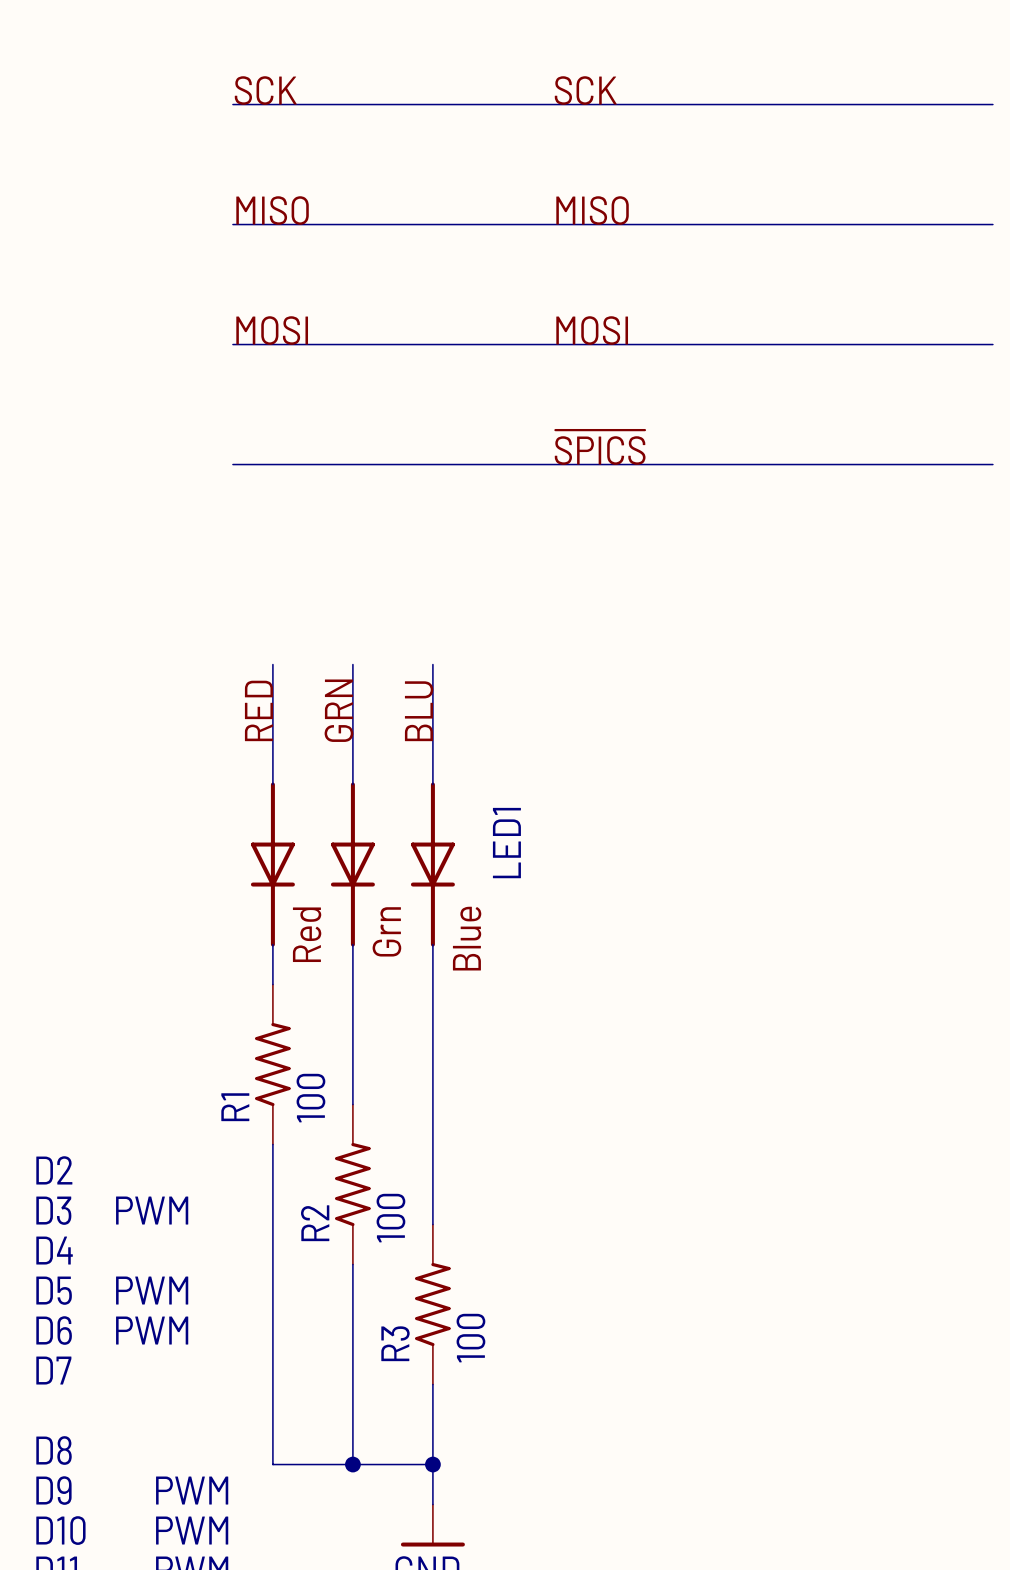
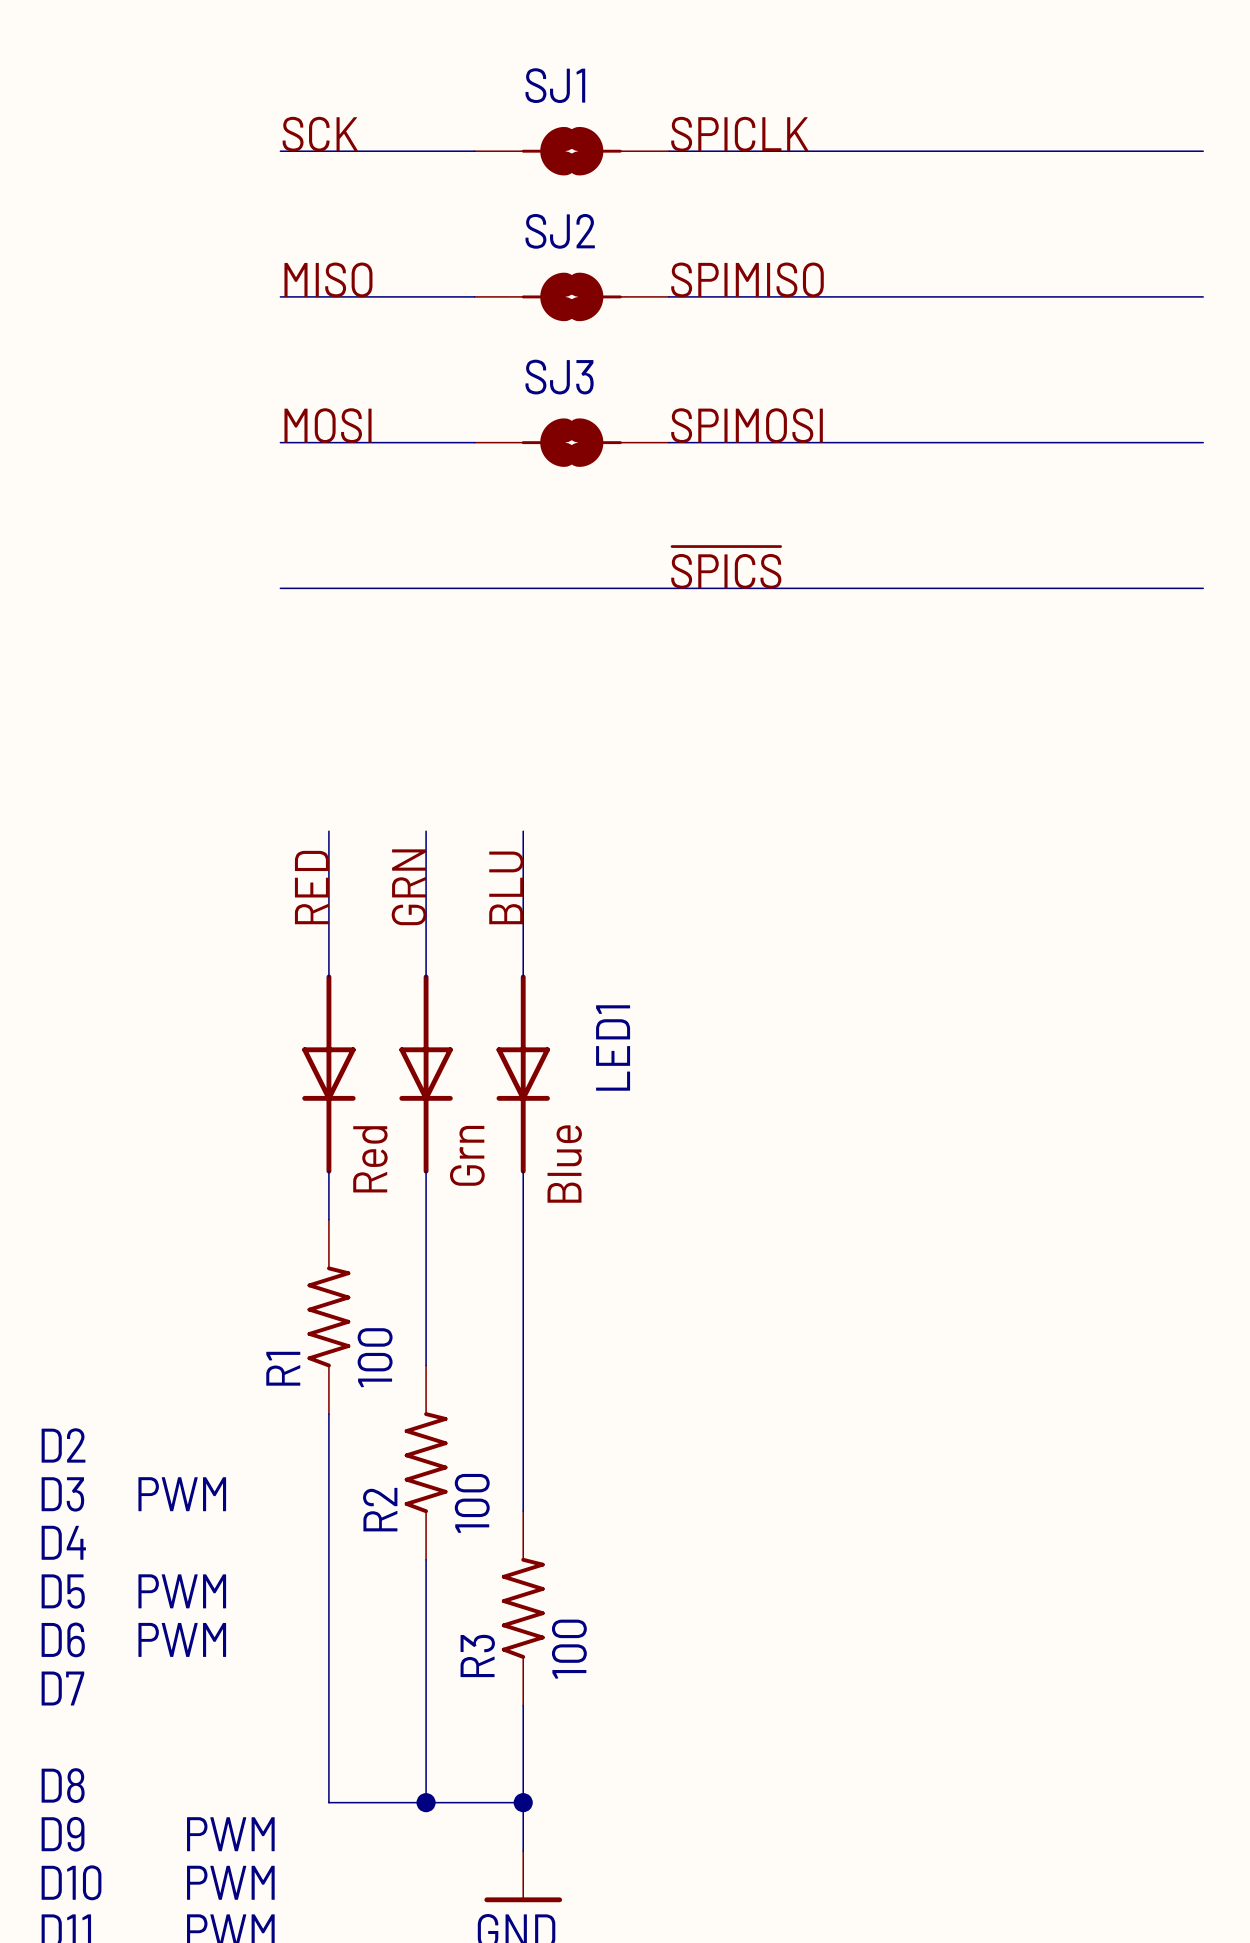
label: SCK (585, 90) -> SPICLK (739, 134)
SJ1: none -> (571, 151)
label: MISO (592, 210) -> SPIMISO (747, 279)
SJ2: none -> (571, 296)
label: MOSI (592, 330) -> SPIMOSI (747, 425)
SJ3: none -> (571, 442)

